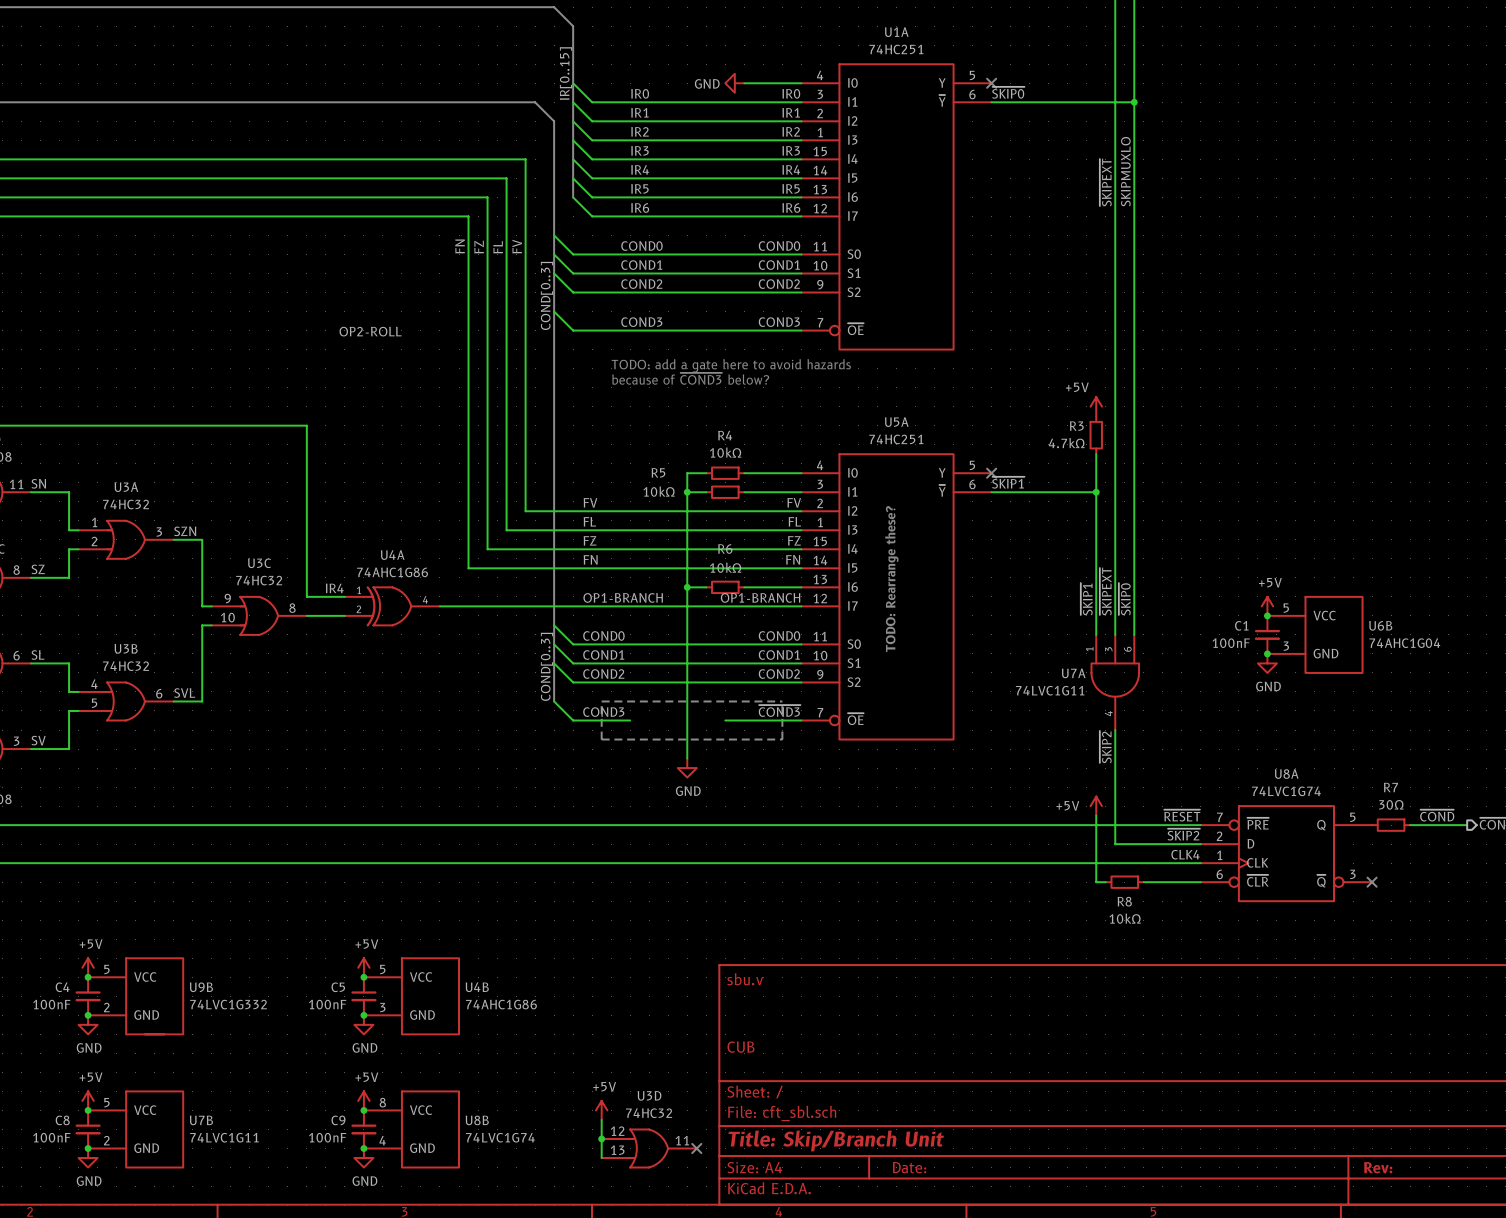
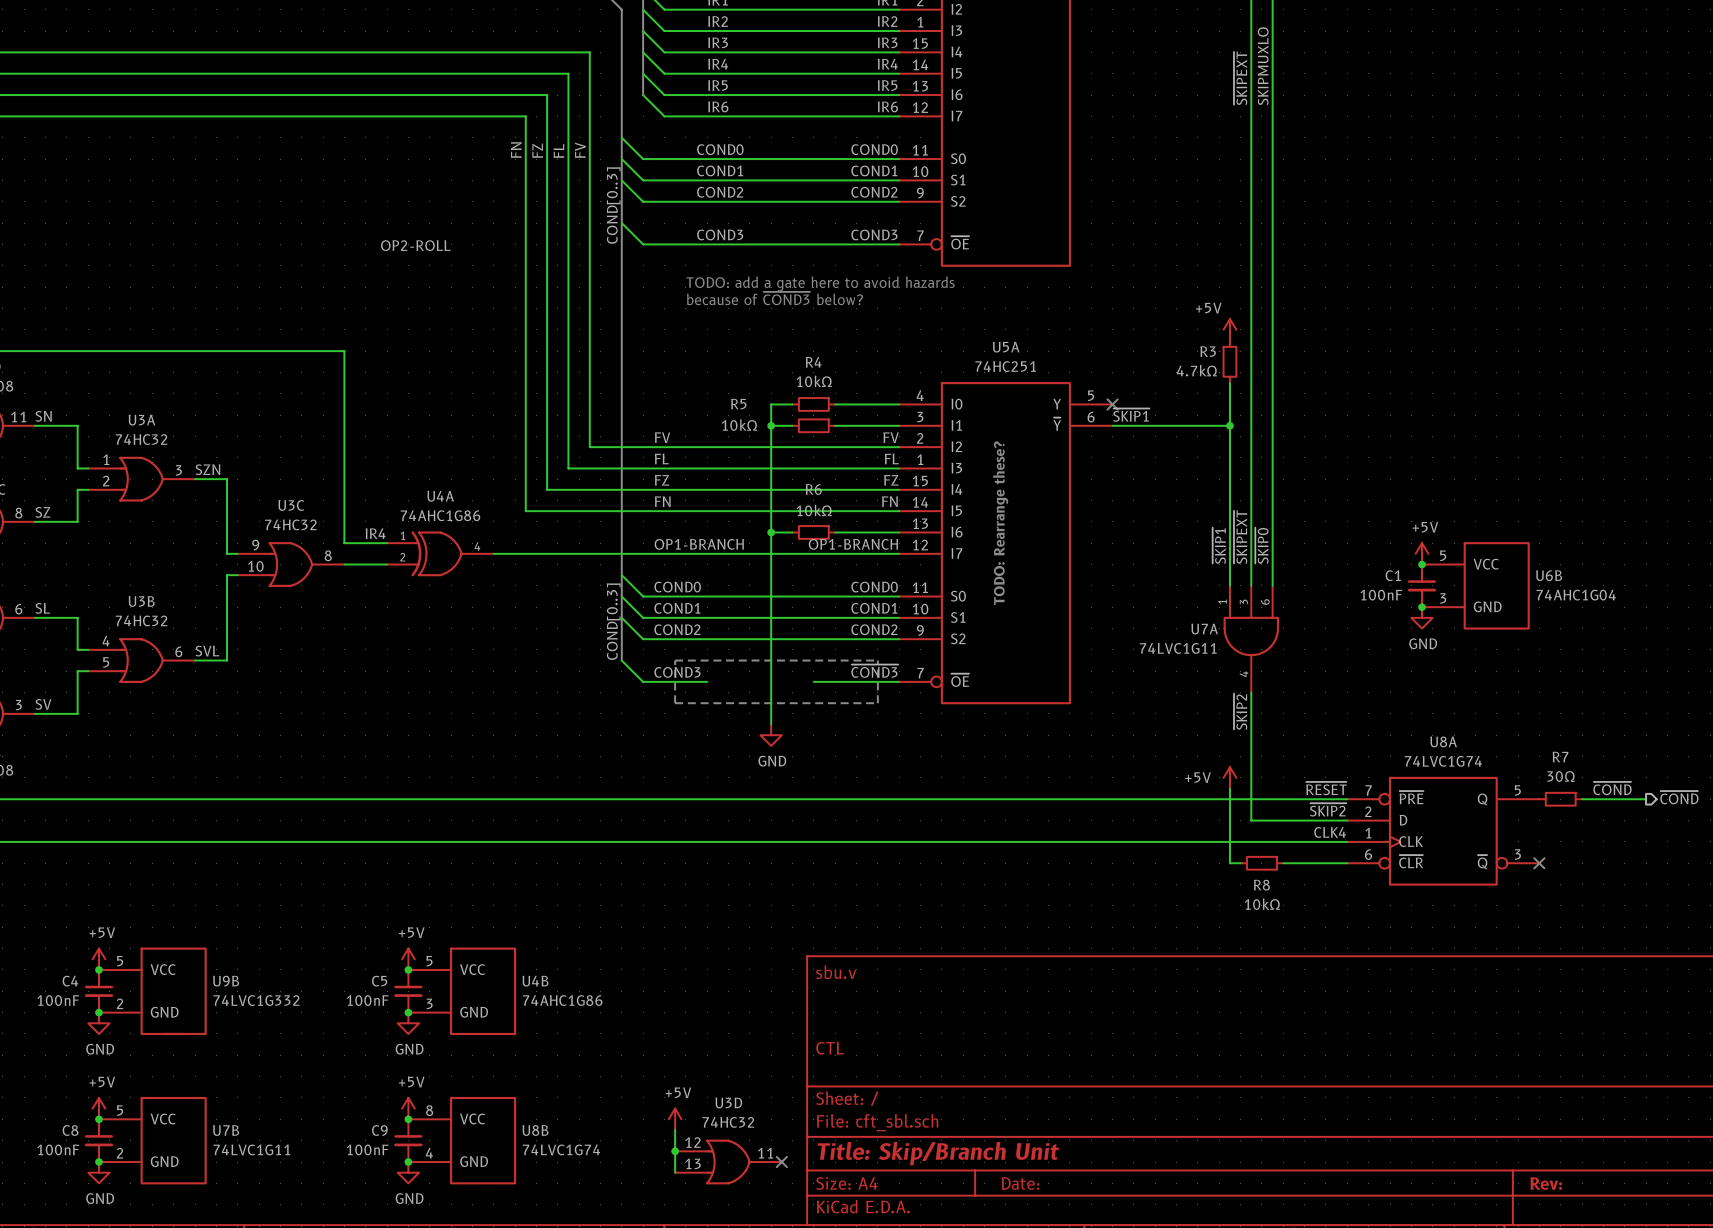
title block: CUB (740, 1047) -> CTL (830, 1048)

